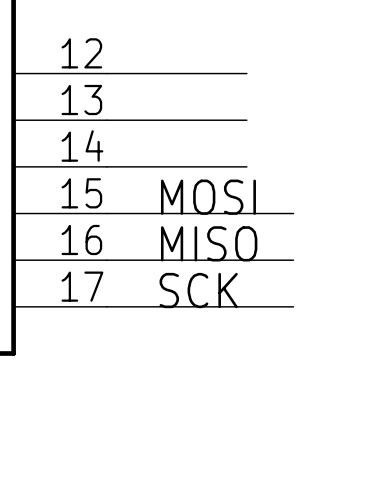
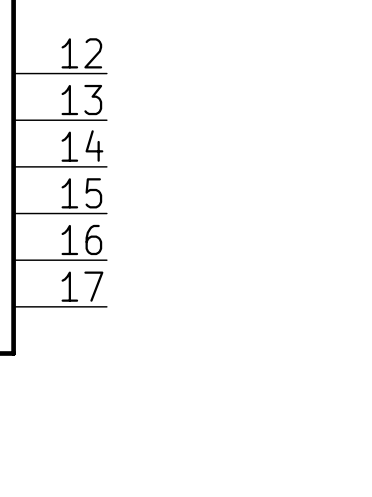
wire: (106, 73) (246, 73) -> none
wire: (106, 120) (246, 120) -> none
wire: (106, 166) (246, 166) -> none
label: MOSI (208, 197) -> none
wire: (106, 213) (293, 213) -> none
label: MISO (209, 243) -> none
wire: (106, 260) (293, 260) -> none
label: SCK (198, 290) -> none
wire: (106, 306) (293, 306) -> none

